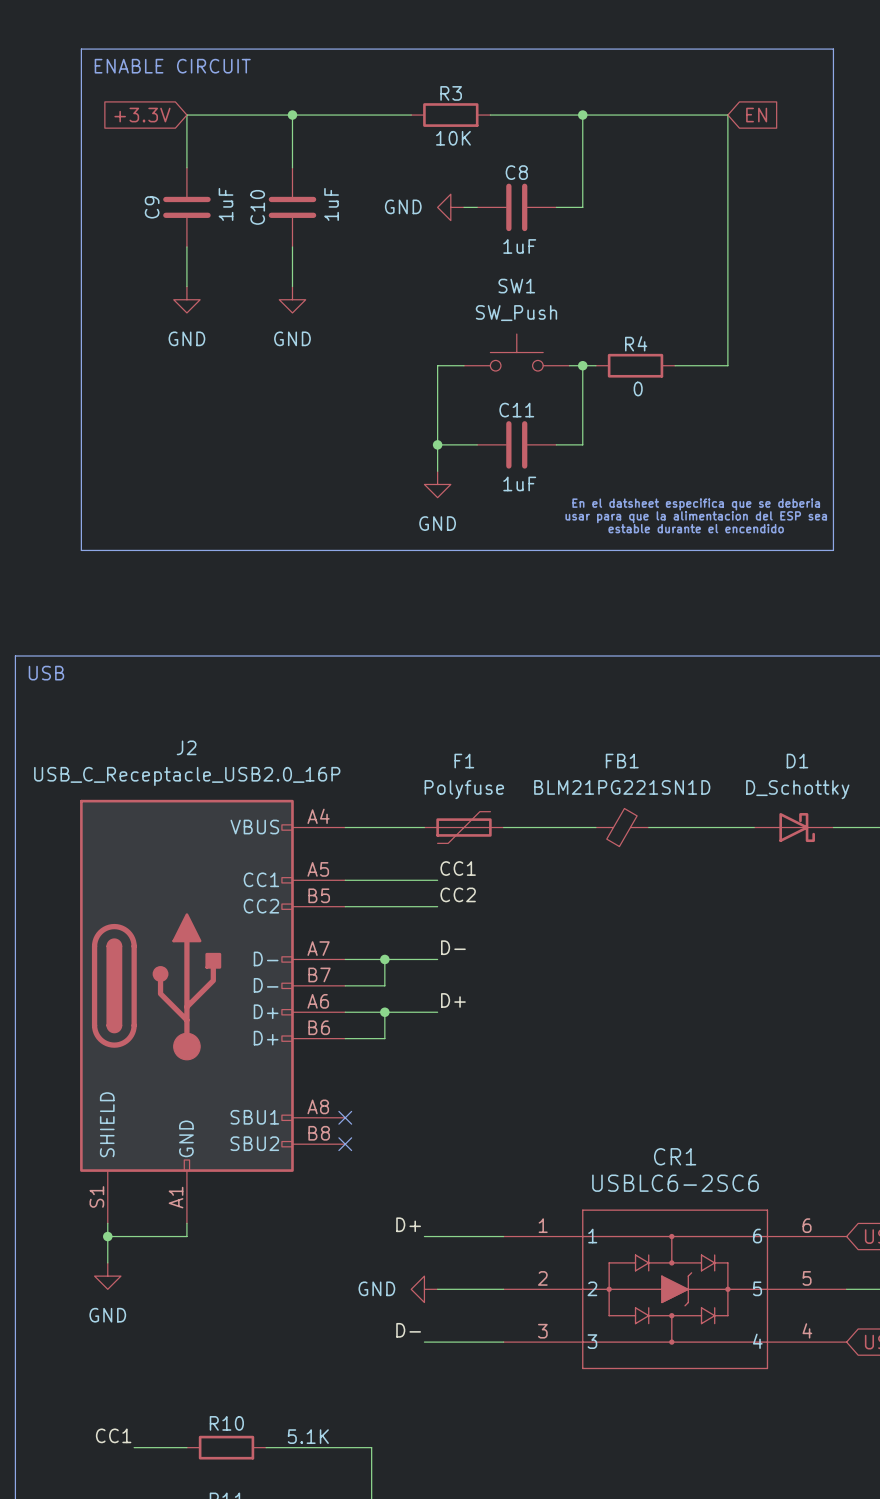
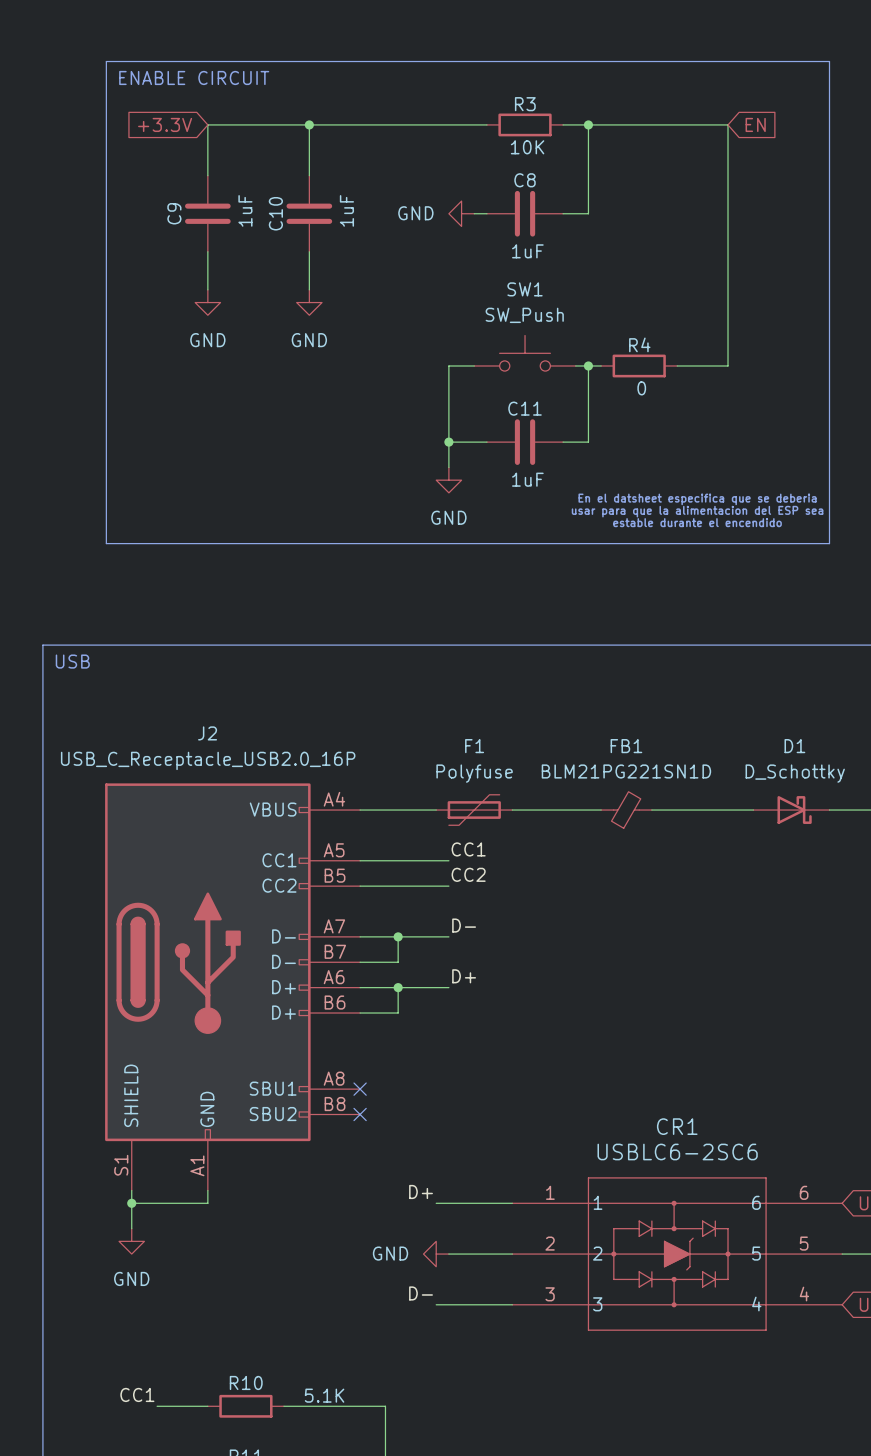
R3 position: (450, 115) -> (525, 124)
wire: (490, 115) (556, 115) -> (423, 124) (486, 124)

